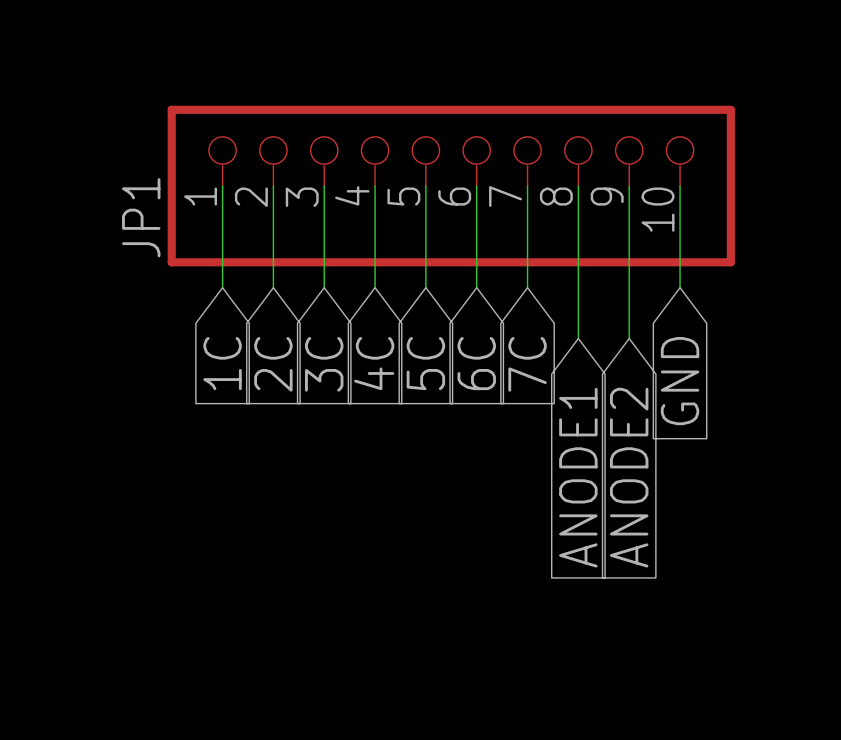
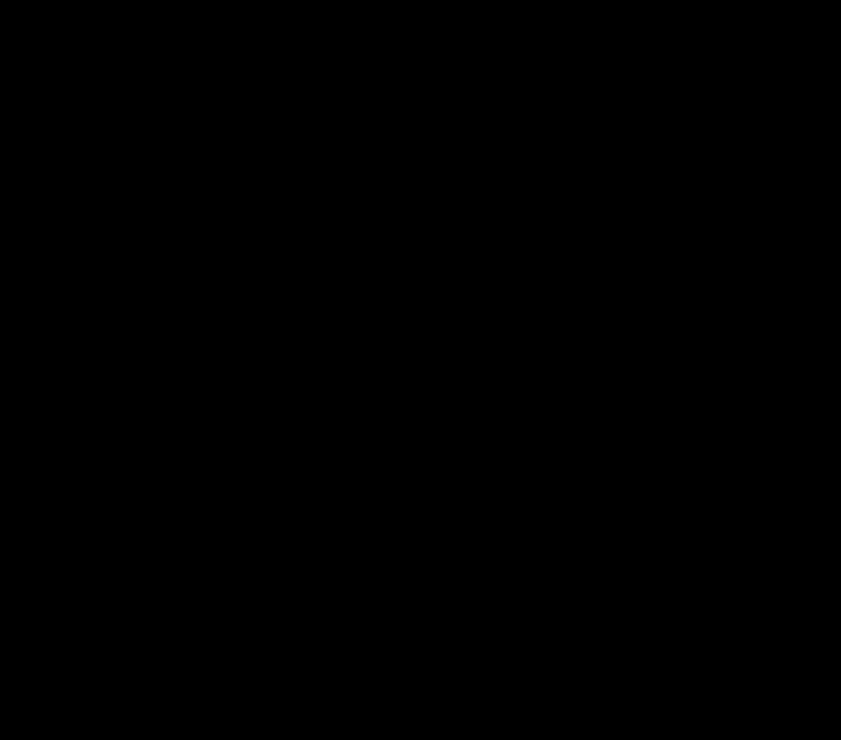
wire: (222, 186) (222, 287) -> none
wire: (273, 186) (273, 287) -> none
wire: (324, 186) (324, 287) -> none
wire: (375, 186) (375, 287) -> none
wire: (425, 186) (425, 287) -> none
JP1: (451, 186) -> none
wire: (476, 186) (476, 287) -> none
wire: (527, 186) (527, 287) -> none
wire: (578, 186) (578, 338) -> none
wire: (629, 186) (629, 338) -> none
wire: (680, 186) (680, 287) -> none
global label: 1C (222, 363) -> none
global label: 4C (374, 363) -> none
global label: 5C (425, 363) -> none
global label: 6C (476, 363) -> none
global label: 2C (273, 364) -> none
global label: 3C (324, 364) -> none
global label: 7C (527, 364) -> none
global label: GND (680, 381) -> none
global label: ANODE1 (578, 477) -> none
global label: ANODE2 (629, 477) -> none

